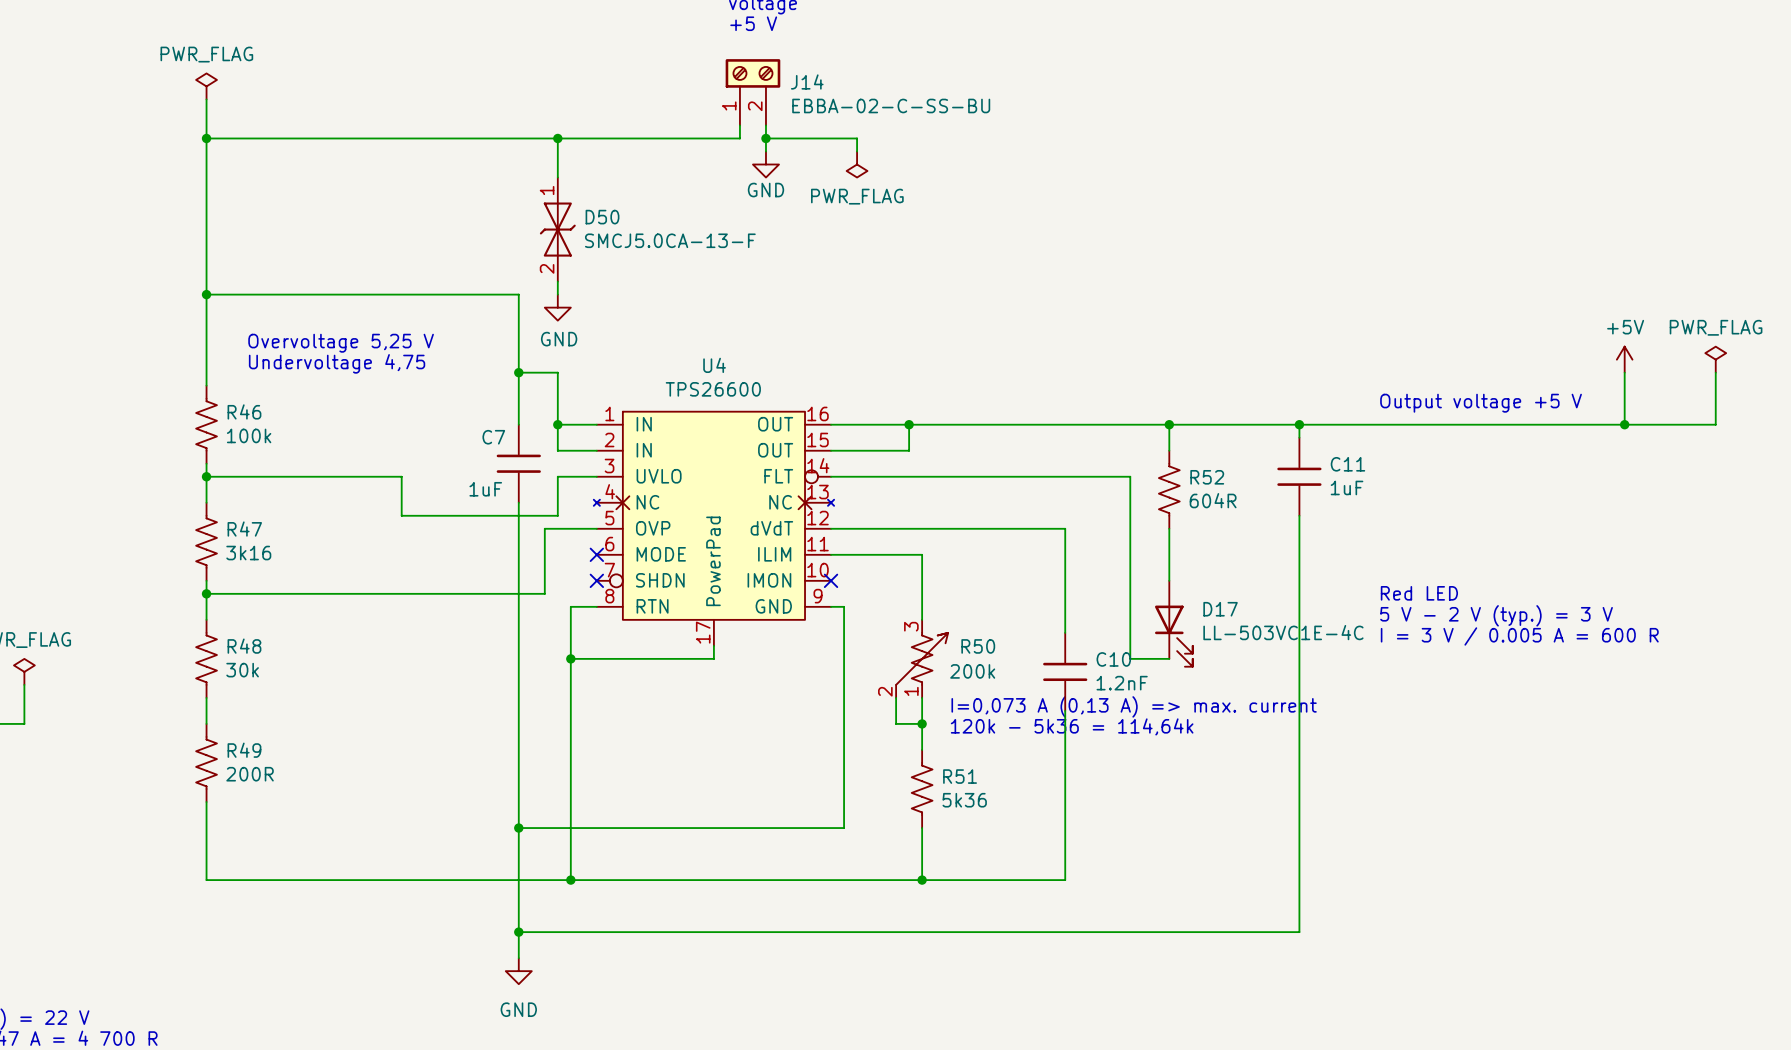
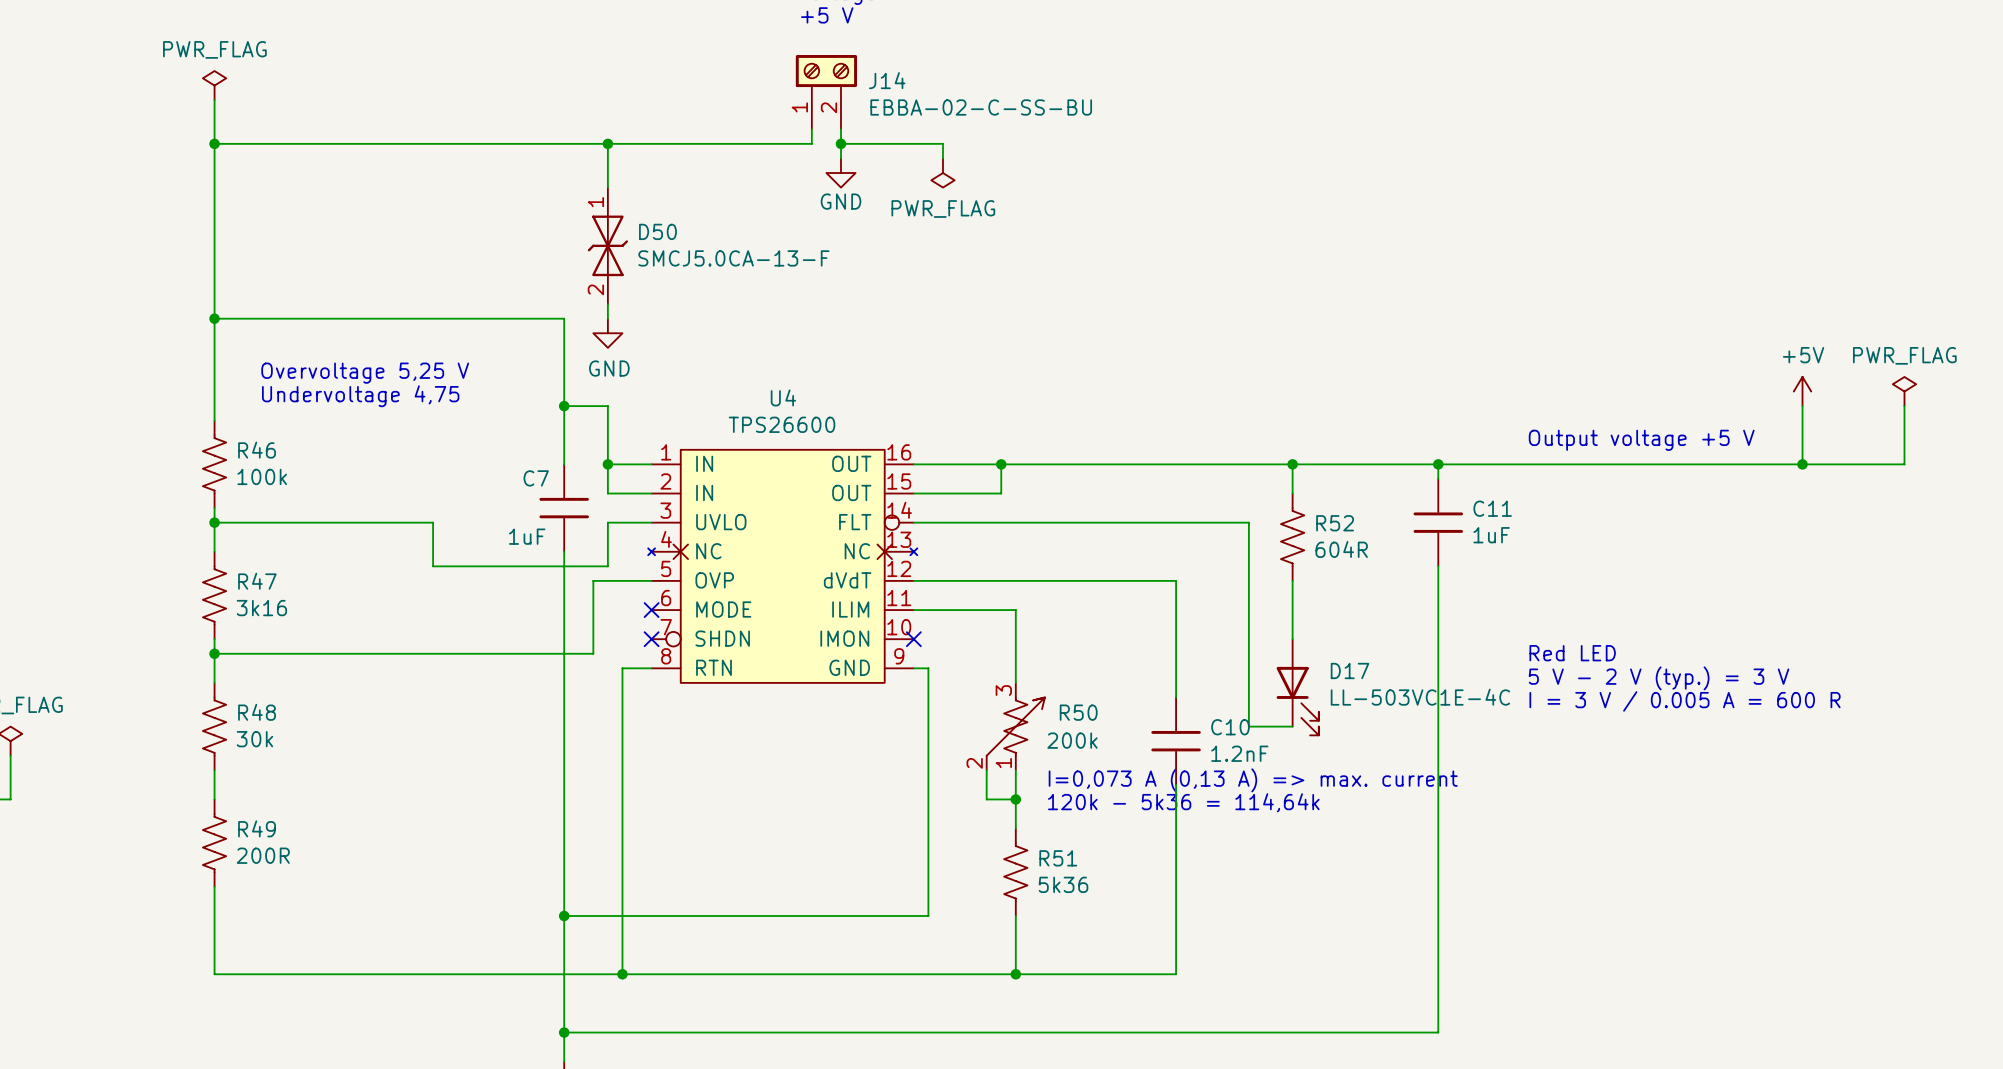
U4 symbol: [593, 411, 835, 646] -> [648, 449, 918, 683]
wire: (713, 645) (713, 658) (570, 658) -> none
junction: (570, 658) -> none

